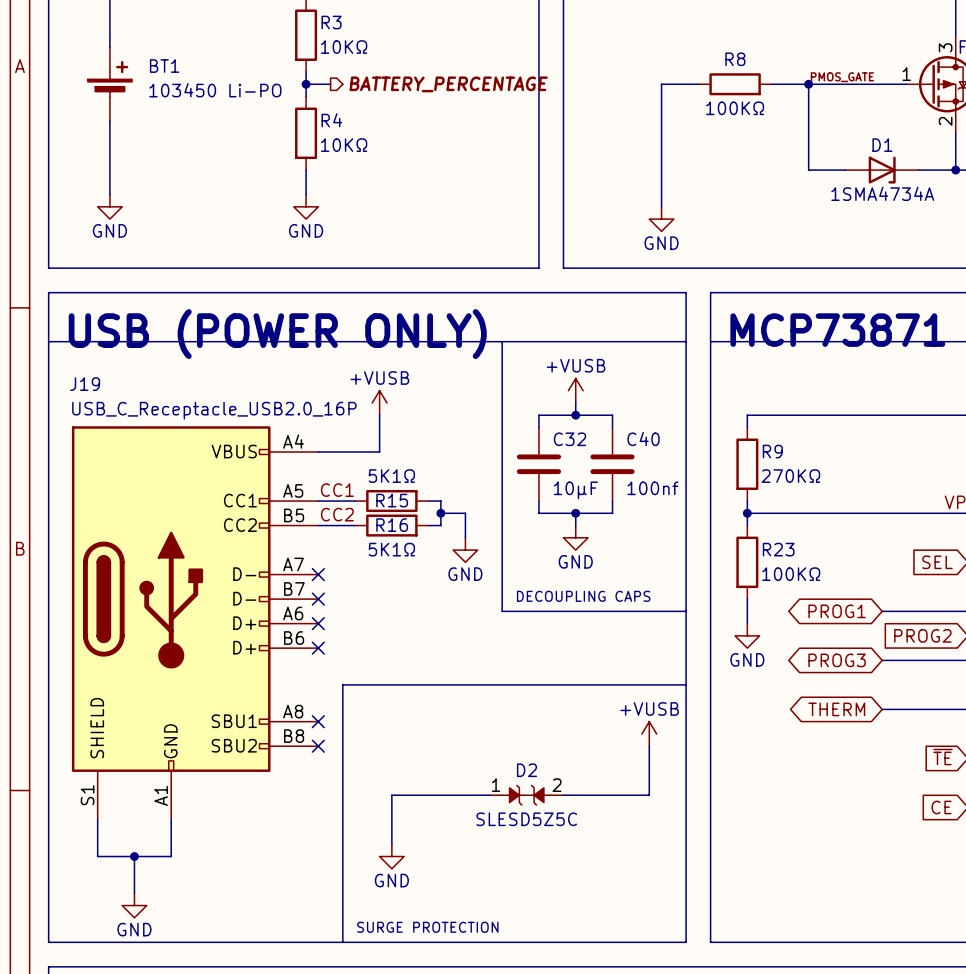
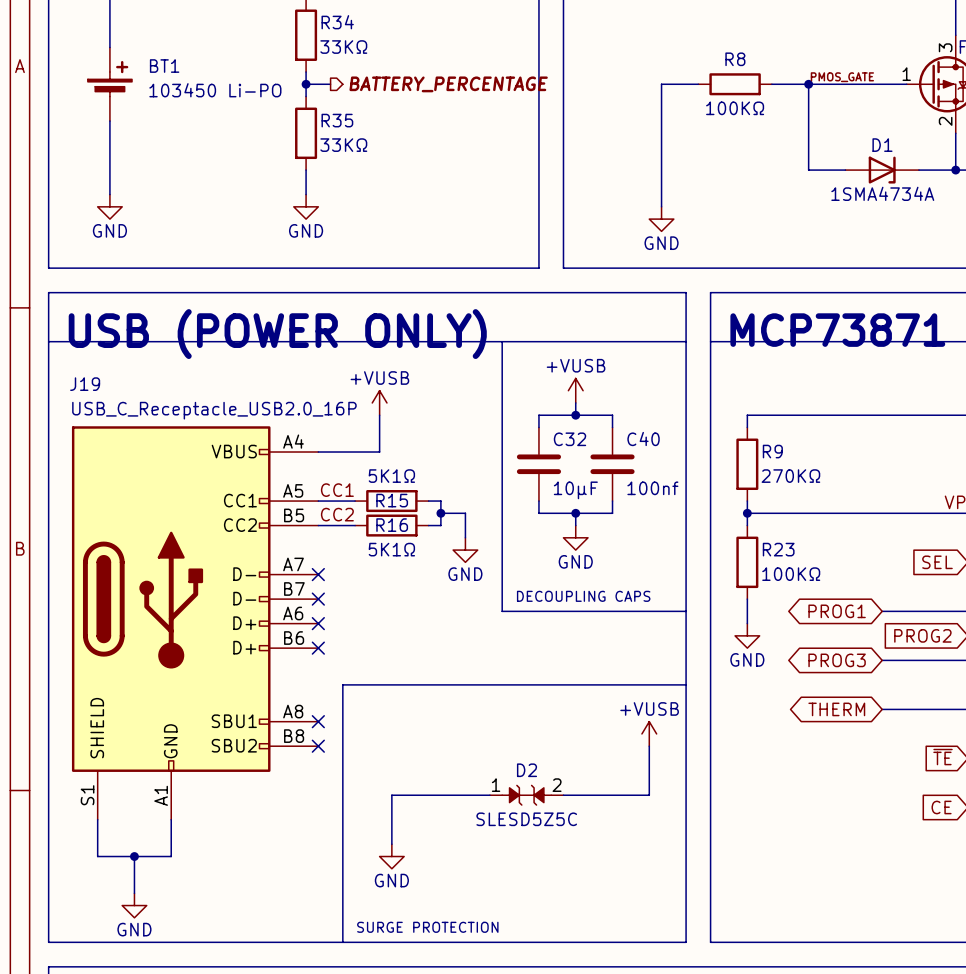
R3 name: R3 (331, 22) -> R34 (337, 22)
R3 value: 10KΩ (344, 47) -> 33KΩ (343, 47)
R4 name: R4 (331, 120) -> R35 (337, 120)
R4 value: 10KΩ (344, 145) -> 33KΩ (343, 145)

